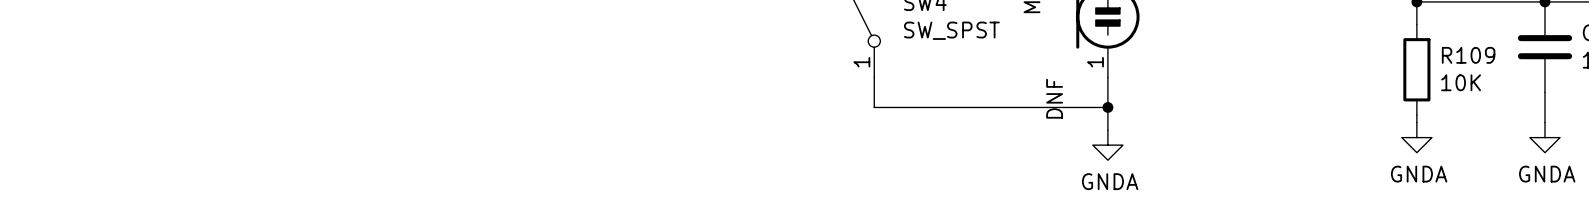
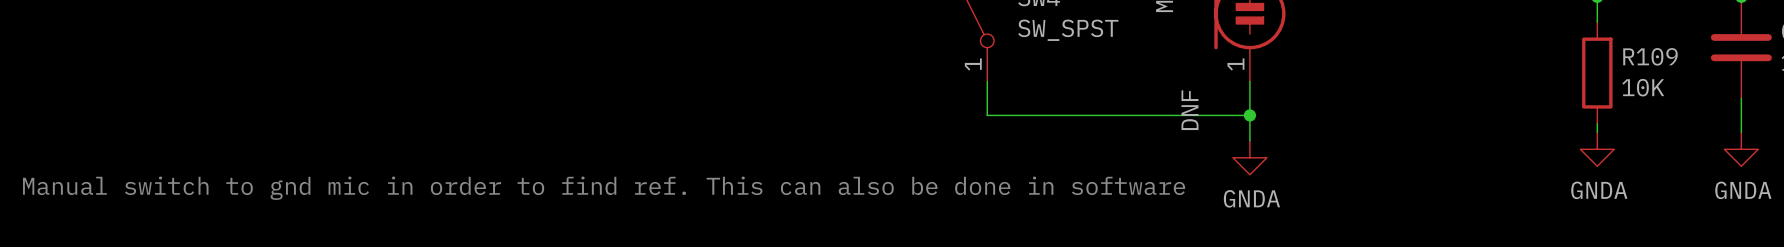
text: none -> Manual switch to gnd mic in order to find ref. This can also be done in software (604, 188)

